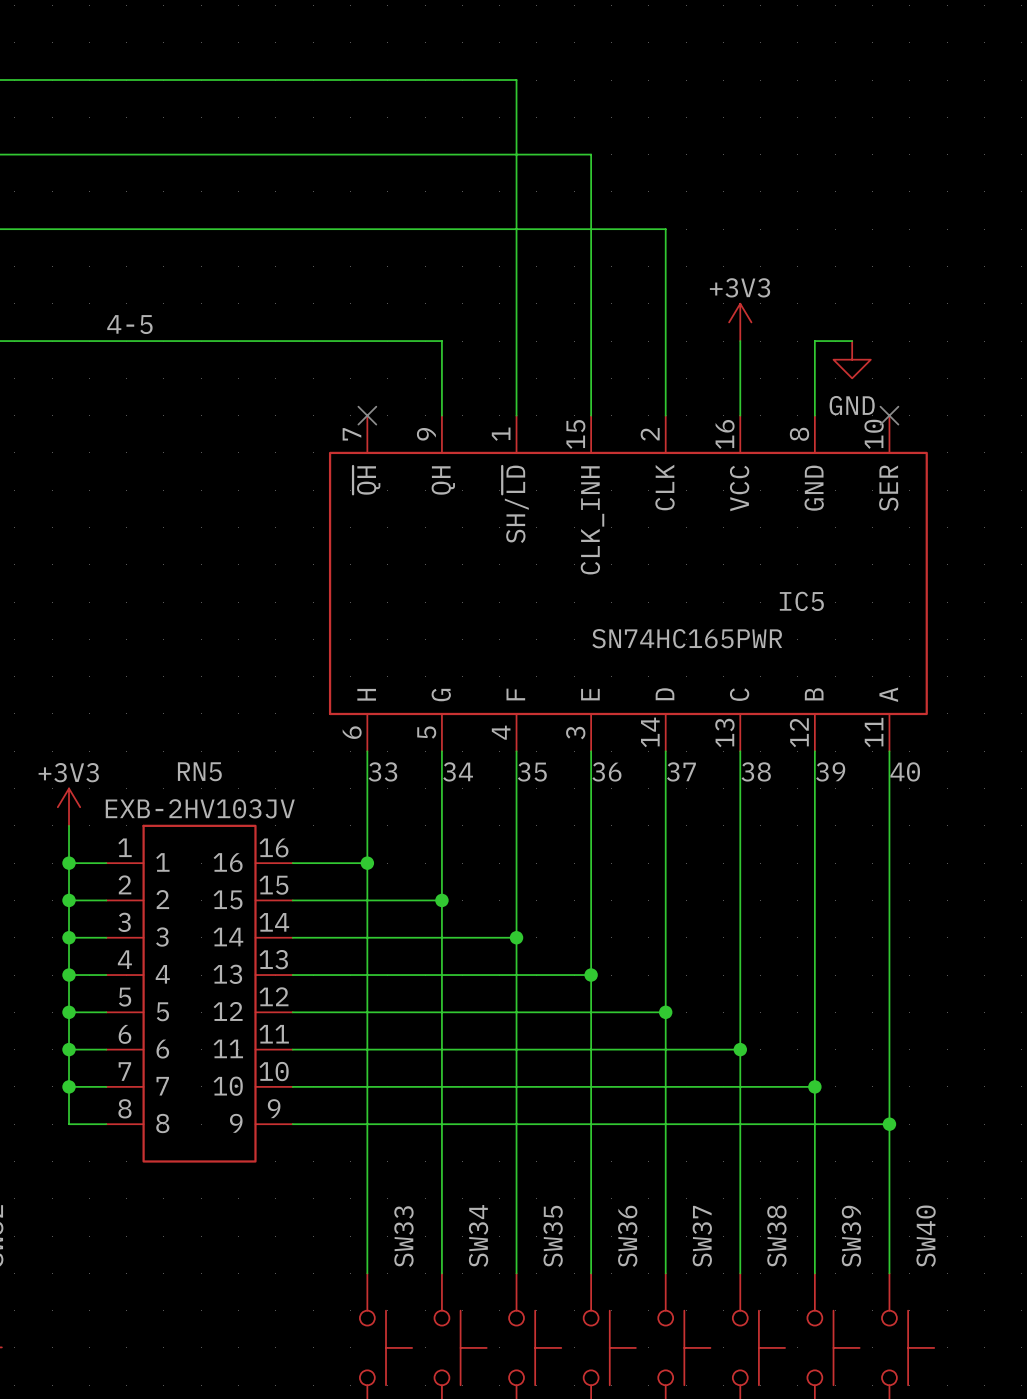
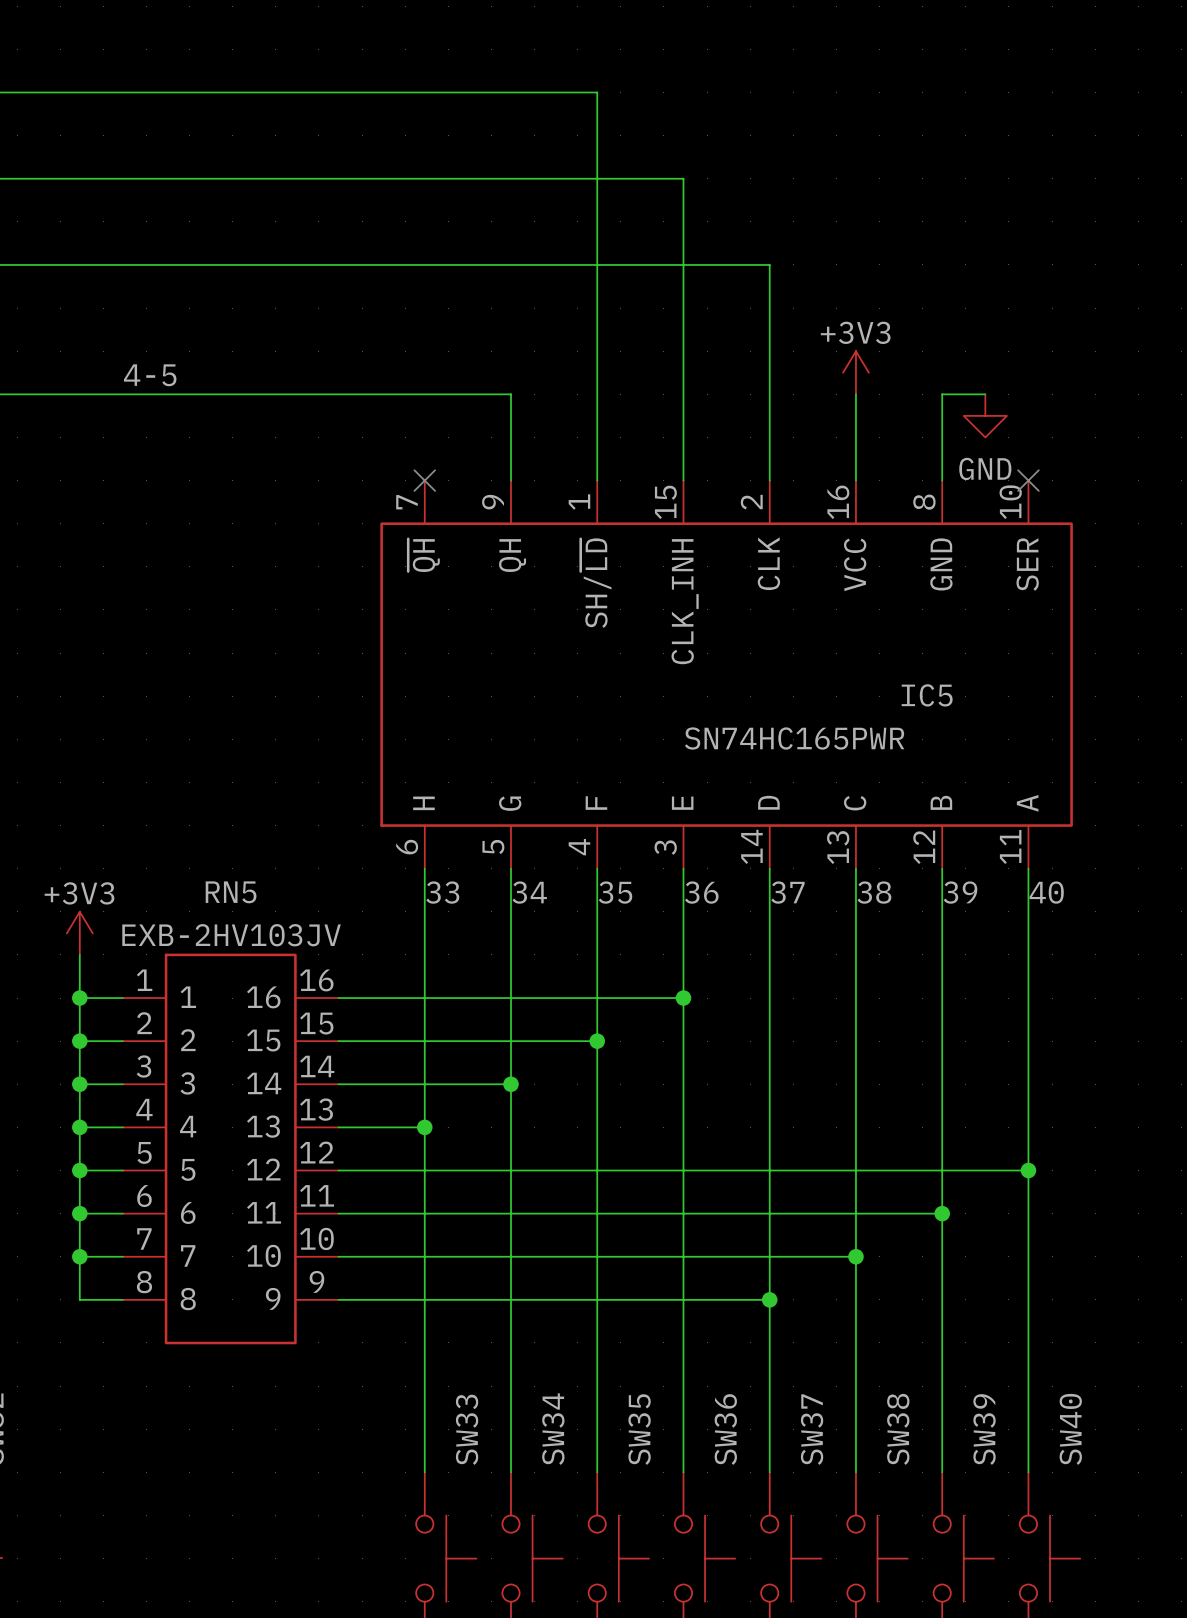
junction: (367, 863) -> none
junction: none -> (683, 998)
junction: (441, 900) -> none
junction: none -> (597, 1041)
wire: (441, 937) (516, 937) -> (511, 1041) (597, 1041)
junction: none -> (511, 1084)
junction: (516, 937) -> none
wire: (367, 975) (591, 975) -> (424, 998) (683, 998)
junction: none -> (424, 1127)
junction: (591, 975) -> none
junction: (665, 1012) -> none
junction: none -> (1028, 1170)
junction: (740, 1049) -> none
junction: none -> (942, 1213)
wire: (740, 1086) (814, 1086) -> (855, 1213) (942, 1213)
junction: none -> (855, 1256)
junction: (814, 1086) -> none
wire: (665, 1124) (889, 1124) -> (769, 1170) (1028, 1170)
junction: none -> (769, 1299)
junction: (889, 1124) -> none

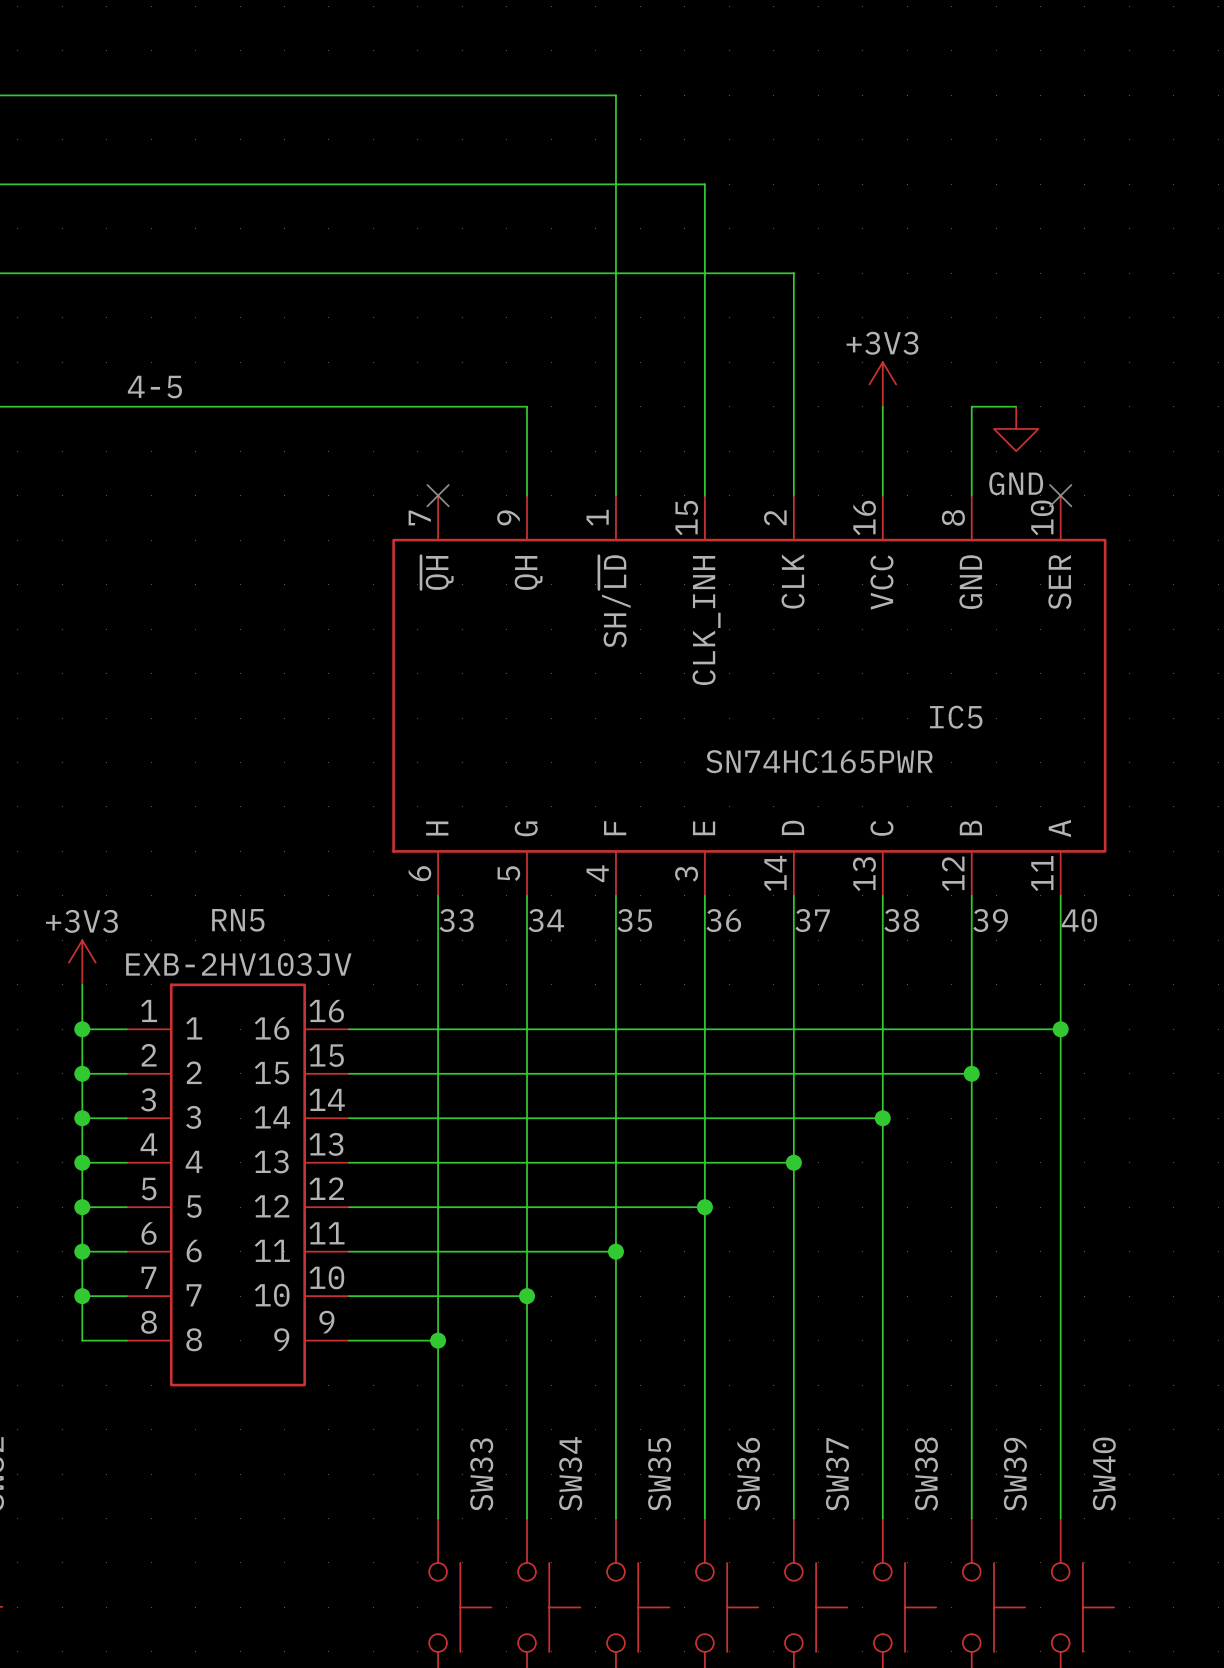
junction: (683, 998) -> none
junction: none -> (1060, 1029)
junction: (597, 1041) -> none
junction: none -> (971, 1073)
junction: (511, 1084) -> none
junction: none -> (882, 1118)
junction: (424, 1127) -> none
junction: none -> (793, 1162)
wire: (683, 1170) (1028, 1170) -> (704, 1029) (1060, 1029)
junction: none -> (704, 1207)
junction: (1028, 1170) -> none
wire: (597, 1213) (942, 1213) -> (615, 1073) (971, 1073)
junction: none -> (615, 1251)
junction: (942, 1213) -> none
wire: (511, 1256) (855, 1256) -> (527, 1118) (882, 1118)
junction: none -> (527, 1296)
junction: (855, 1256) -> none
wire: (424, 1299) (769, 1299) -> (438, 1162) (793, 1162)
junction: none -> (438, 1340)
junction: (769, 1299) -> none

